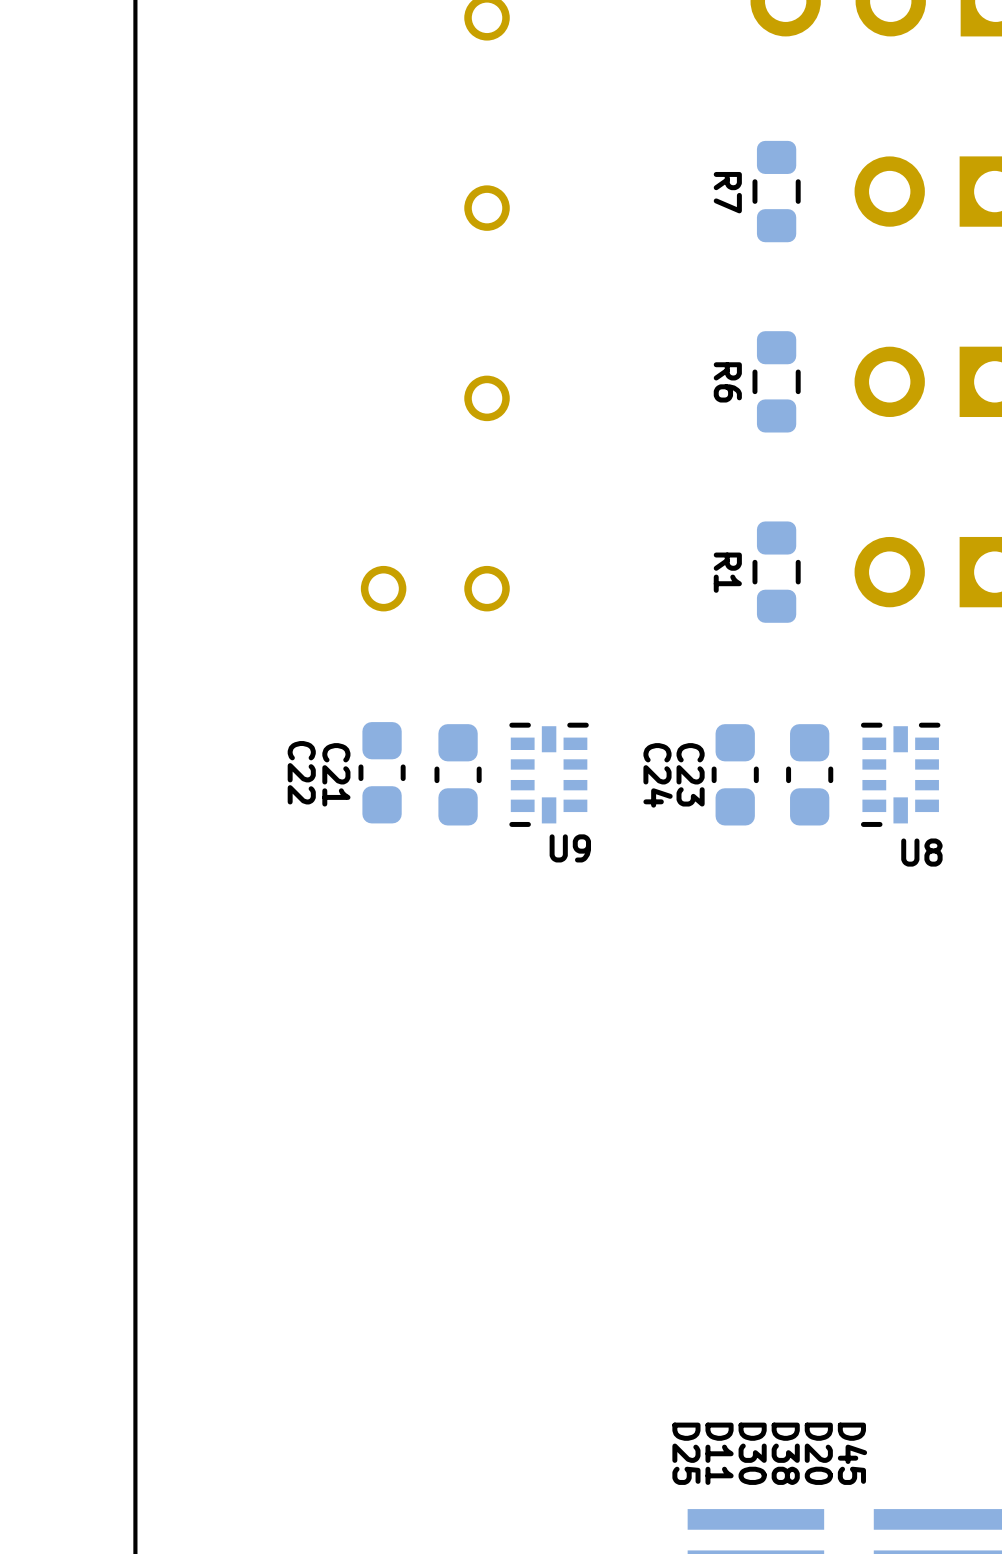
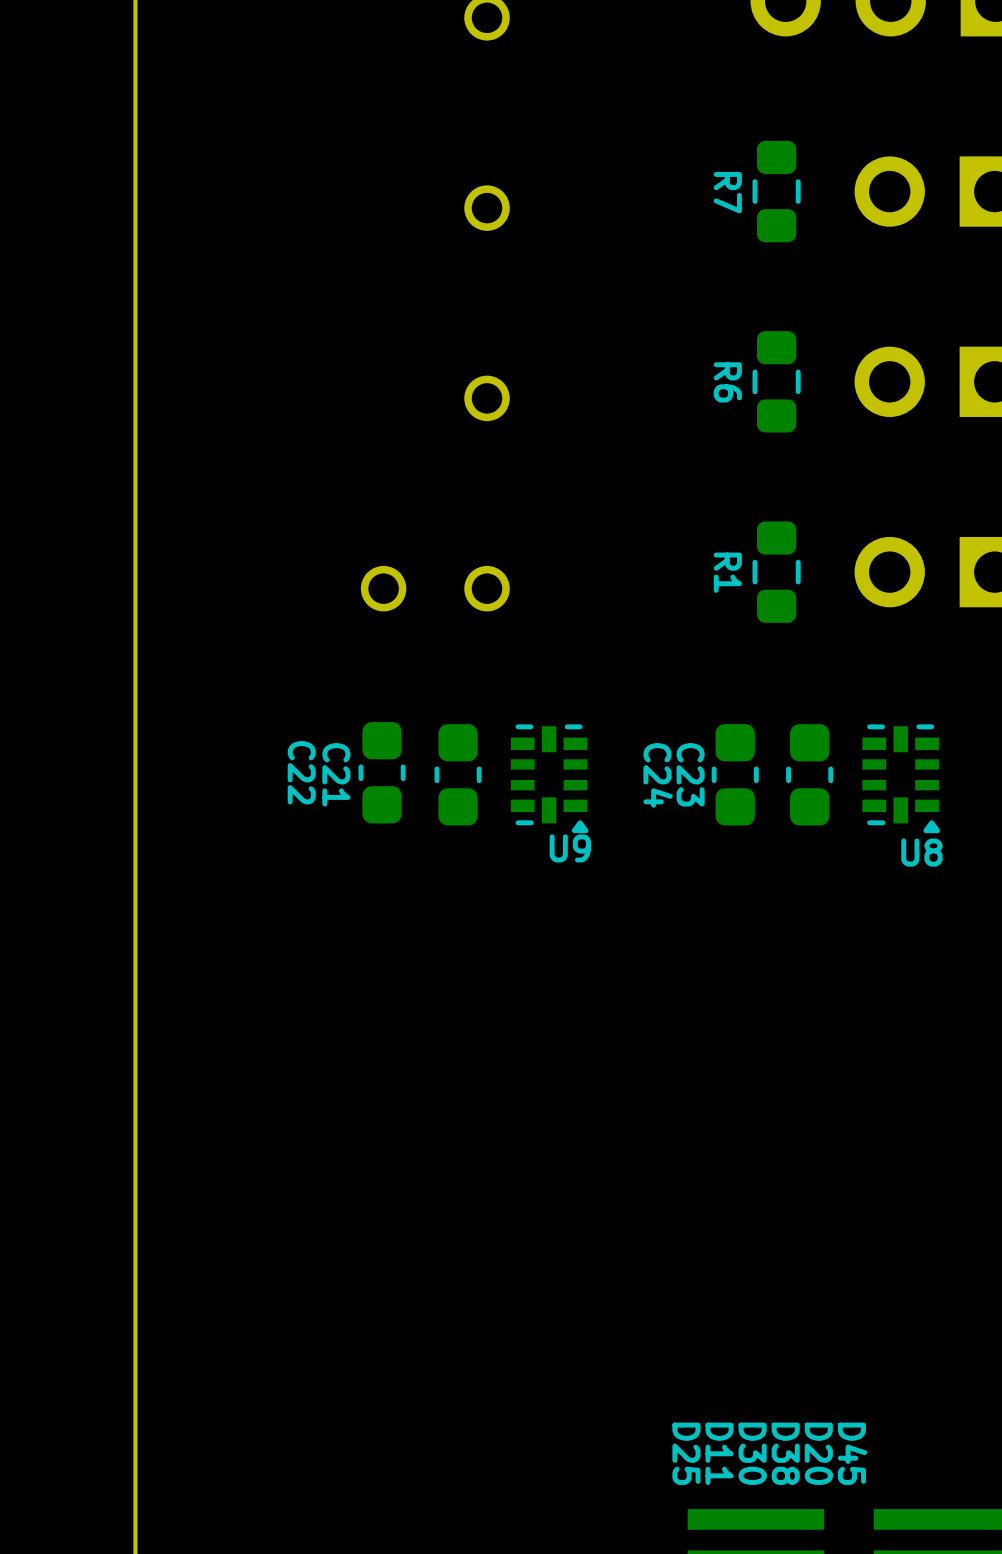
U9 footprint: [509, 722, 589, 827] -> [510, 724, 589, 834]
U8 footprint: [860, 722, 941, 827] -> [862, 724, 940, 834]

